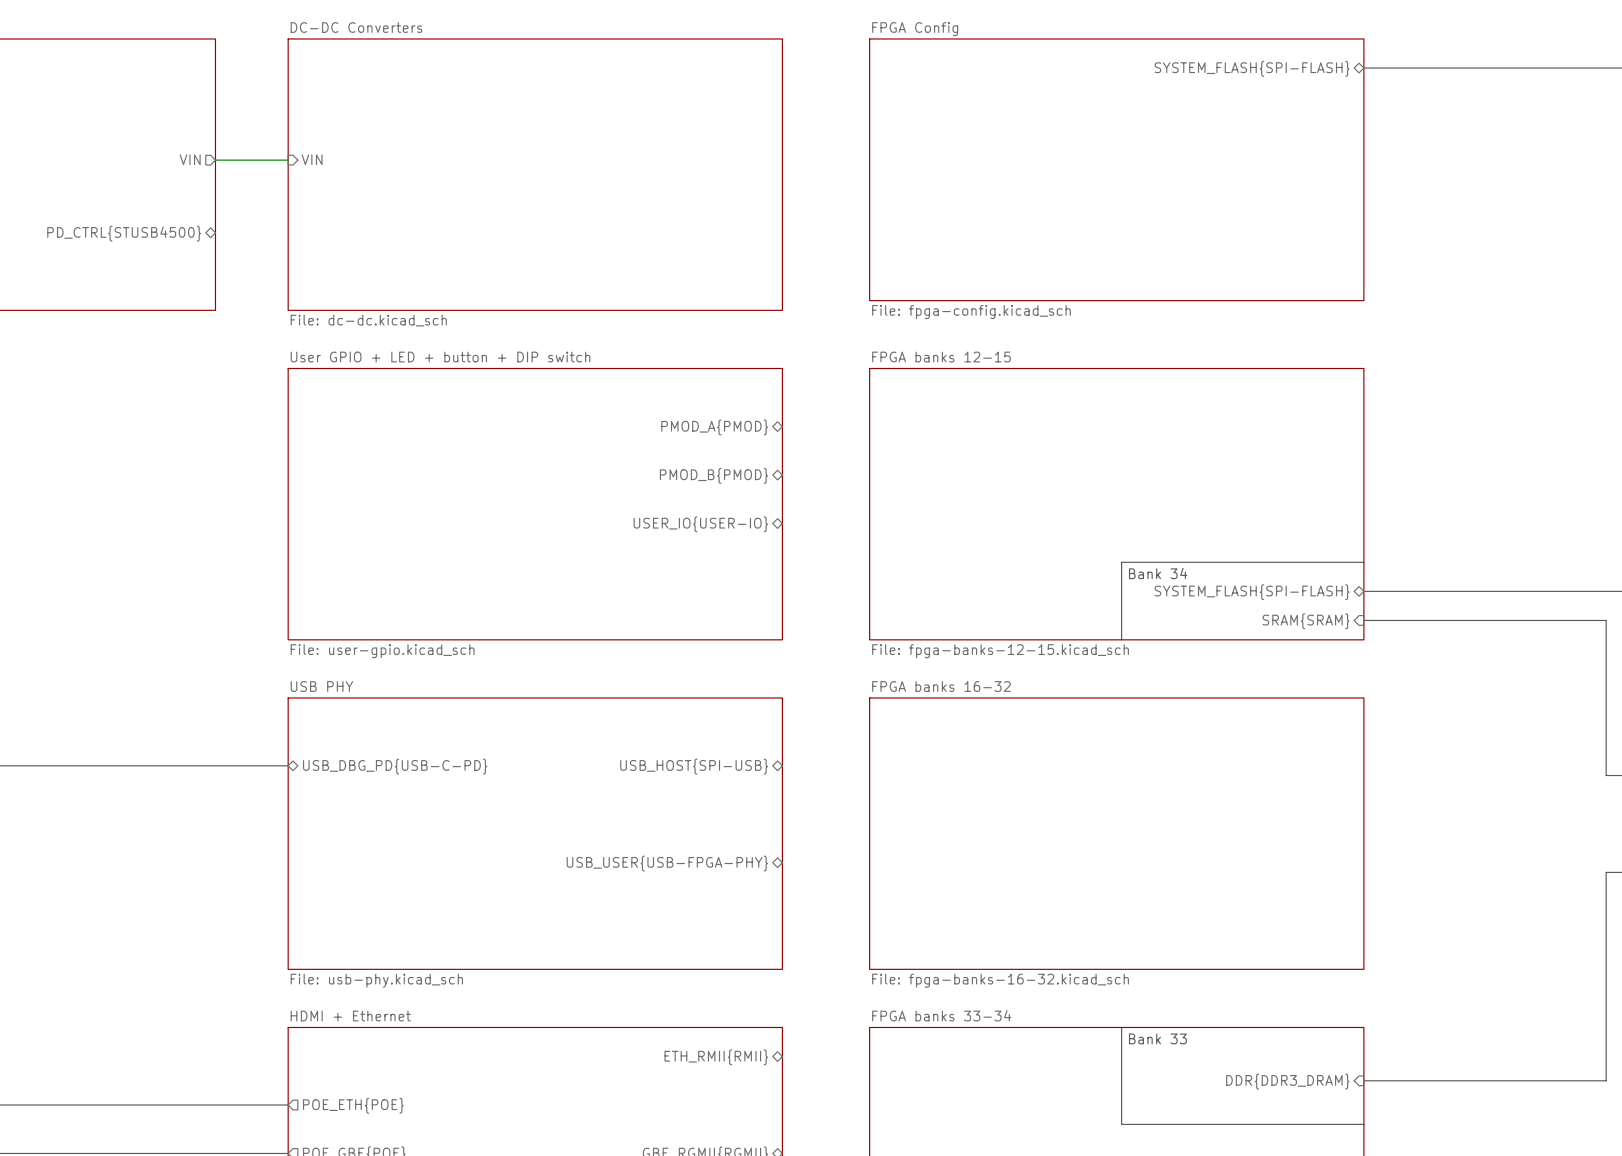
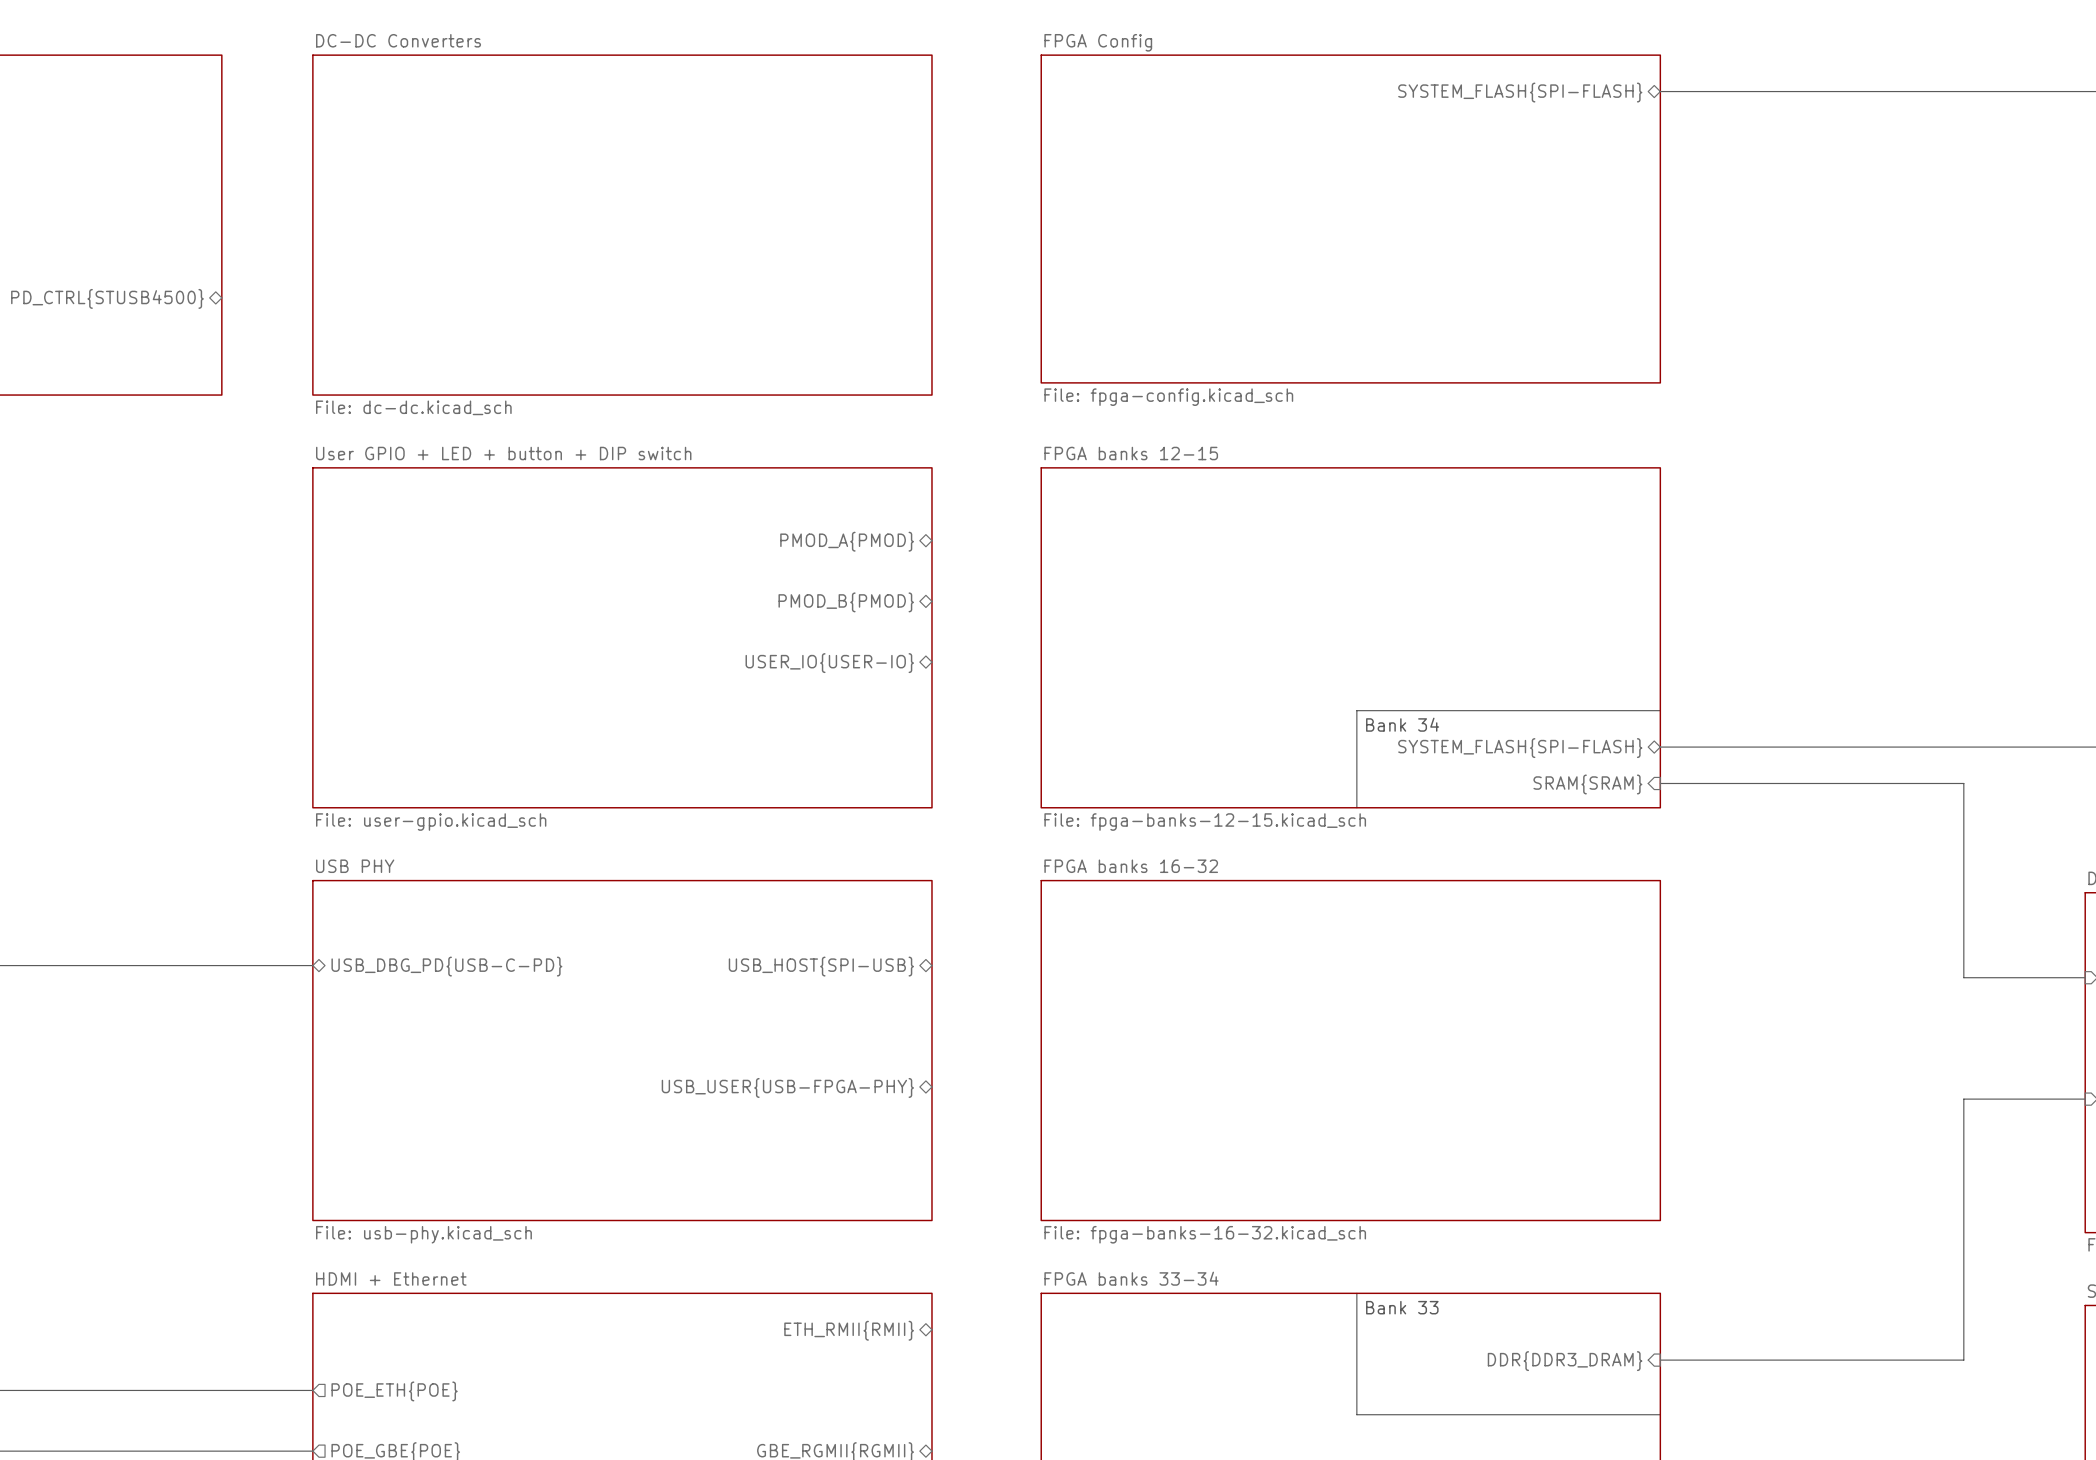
sheet pin: VIN (190, 159) -> none
sheet pin: VIN (312, 159) -> none
wire: (215, 160) (288, 160) -> none

